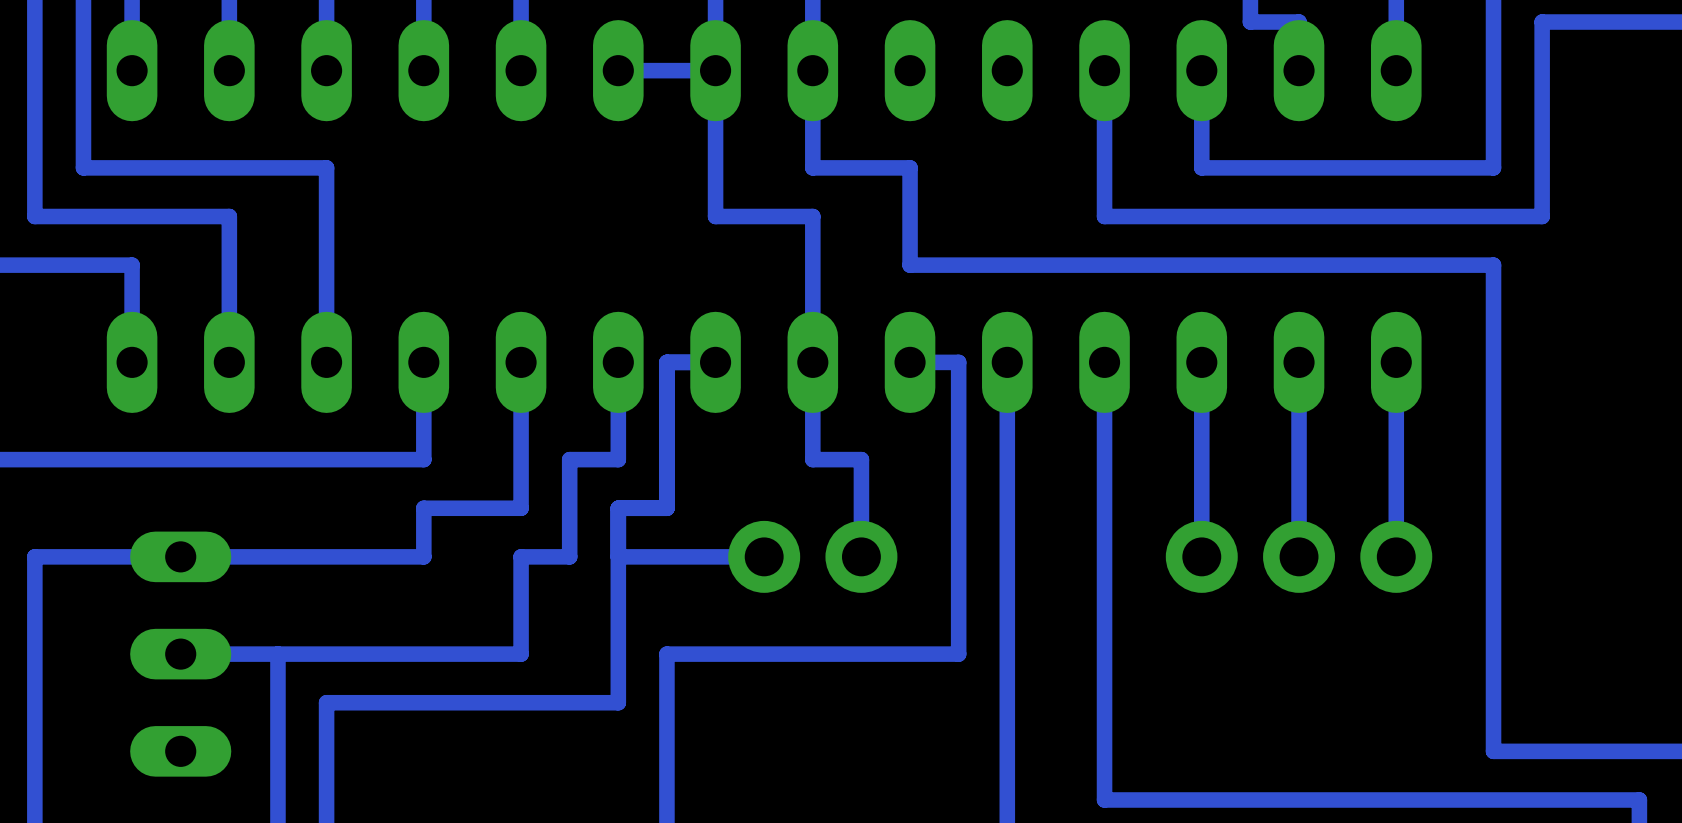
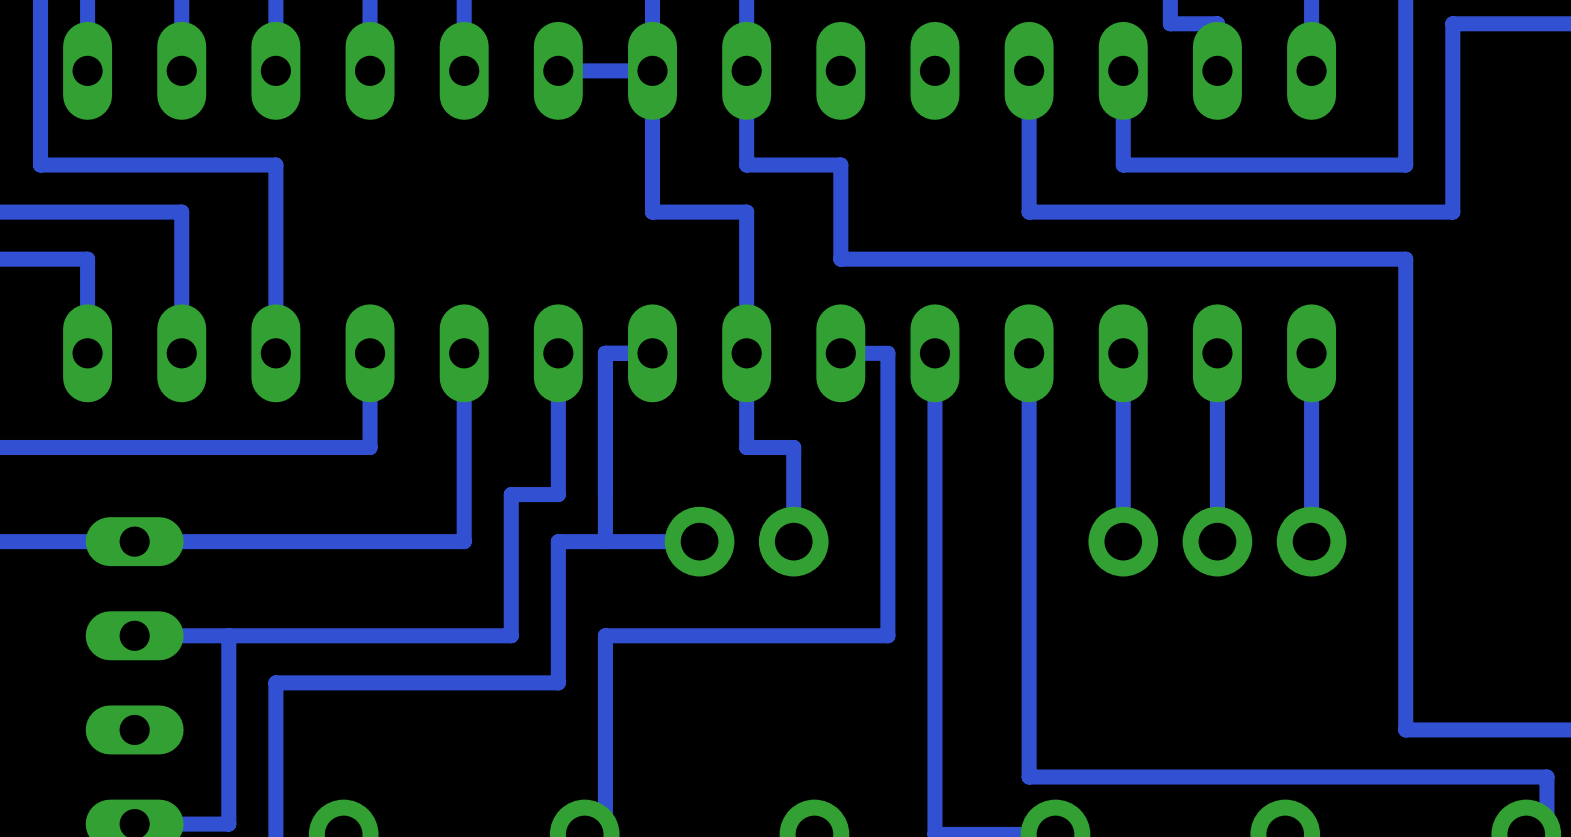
bottom track: (618, 459) (569, 459) (569, 508) -> (558, 447) (558, 494) (511, 494)
bottom track: (521, 508) (423, 508) (423, 556) -> (464, 494) (464, 541) (370, 541)
bottom track: (666, 508) (618, 508) (618, 556) -> (605, 494) (605, 541)
bottom track: (569, 556) (521, 556) (521, 654) -> (511, 541) (511, 635) (464, 635)

